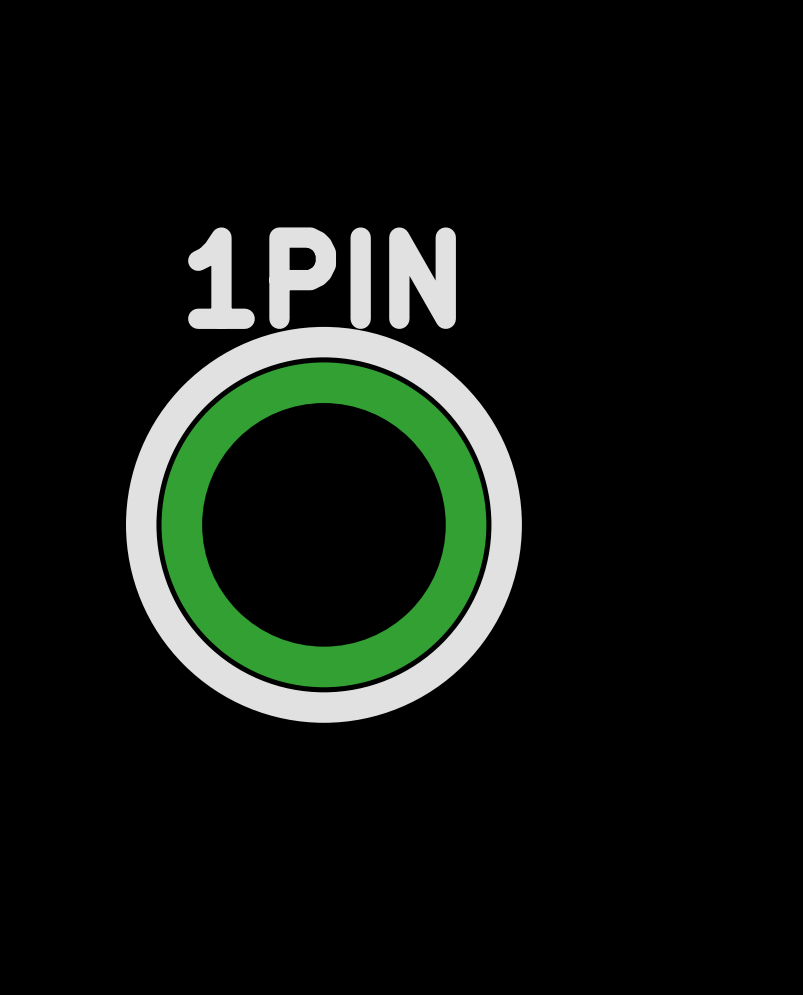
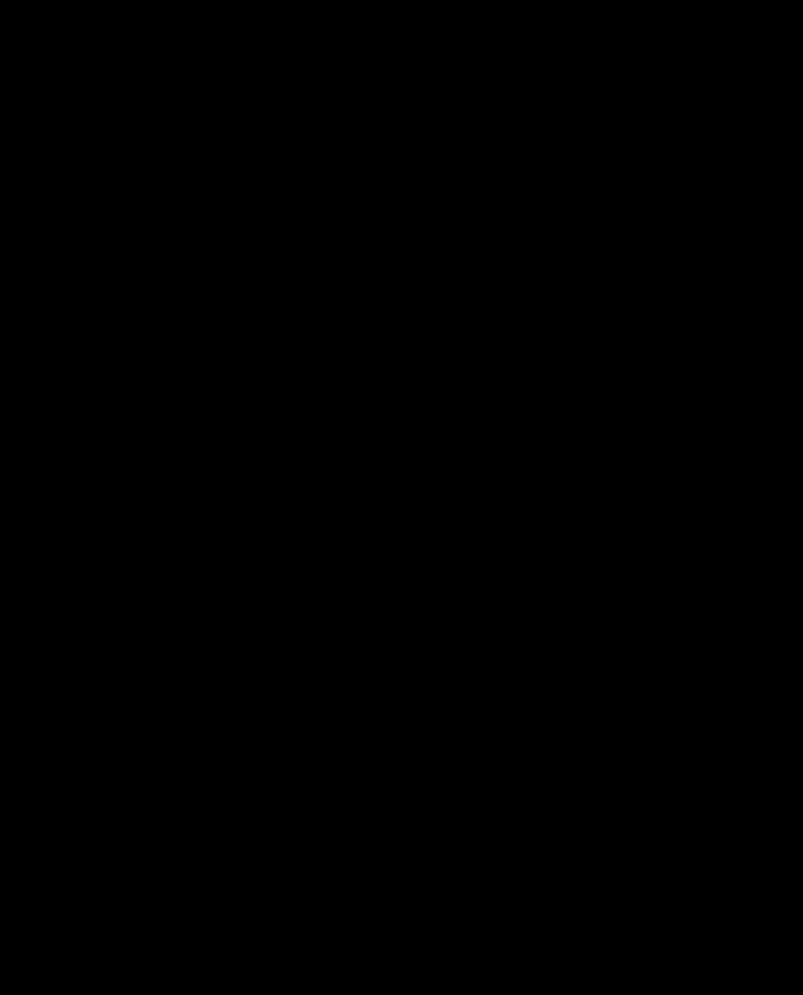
1PIN: (323, 524) -> none

